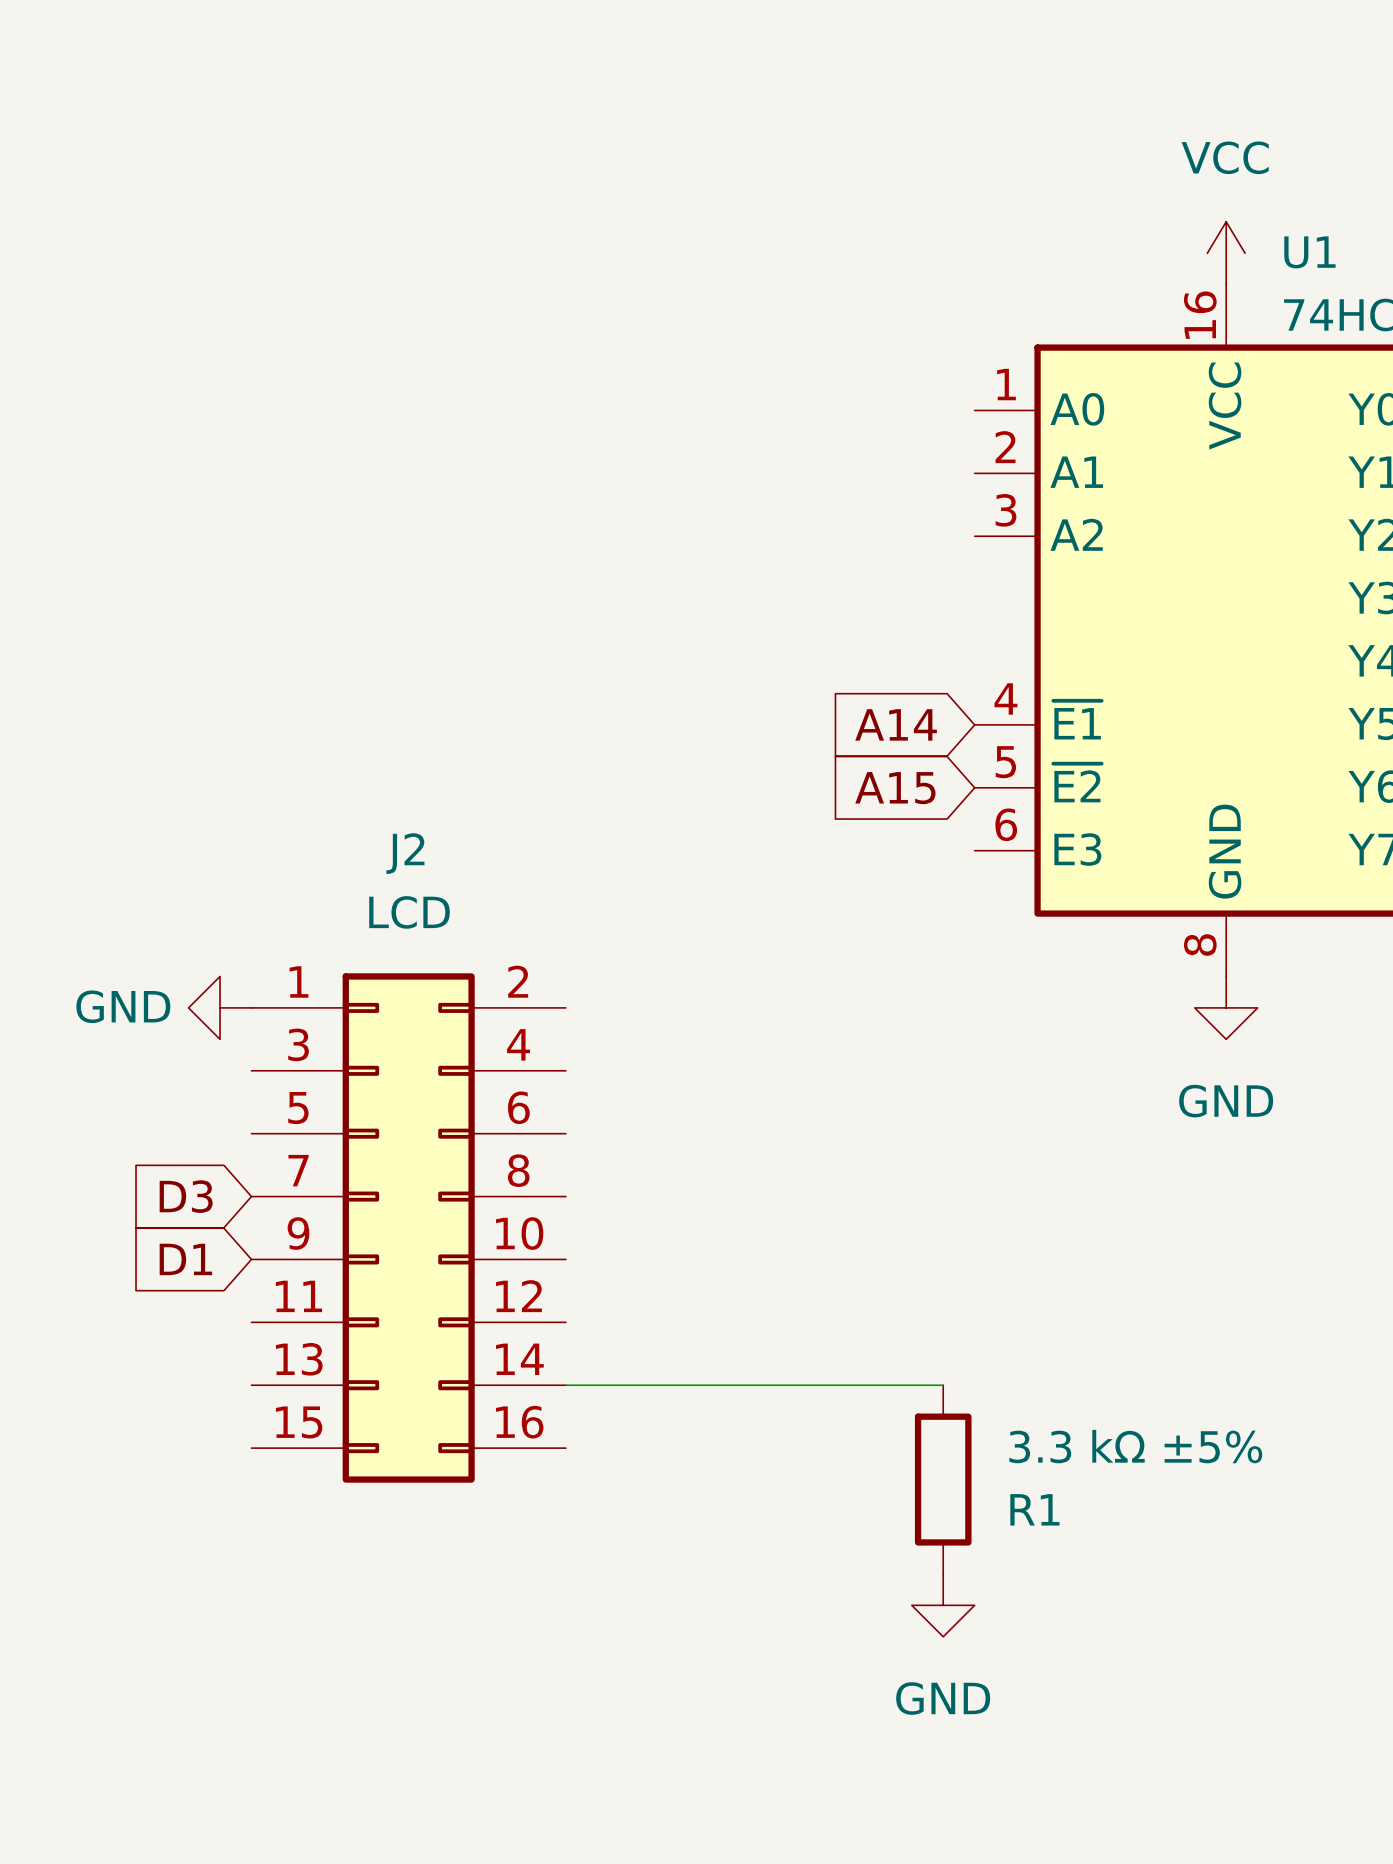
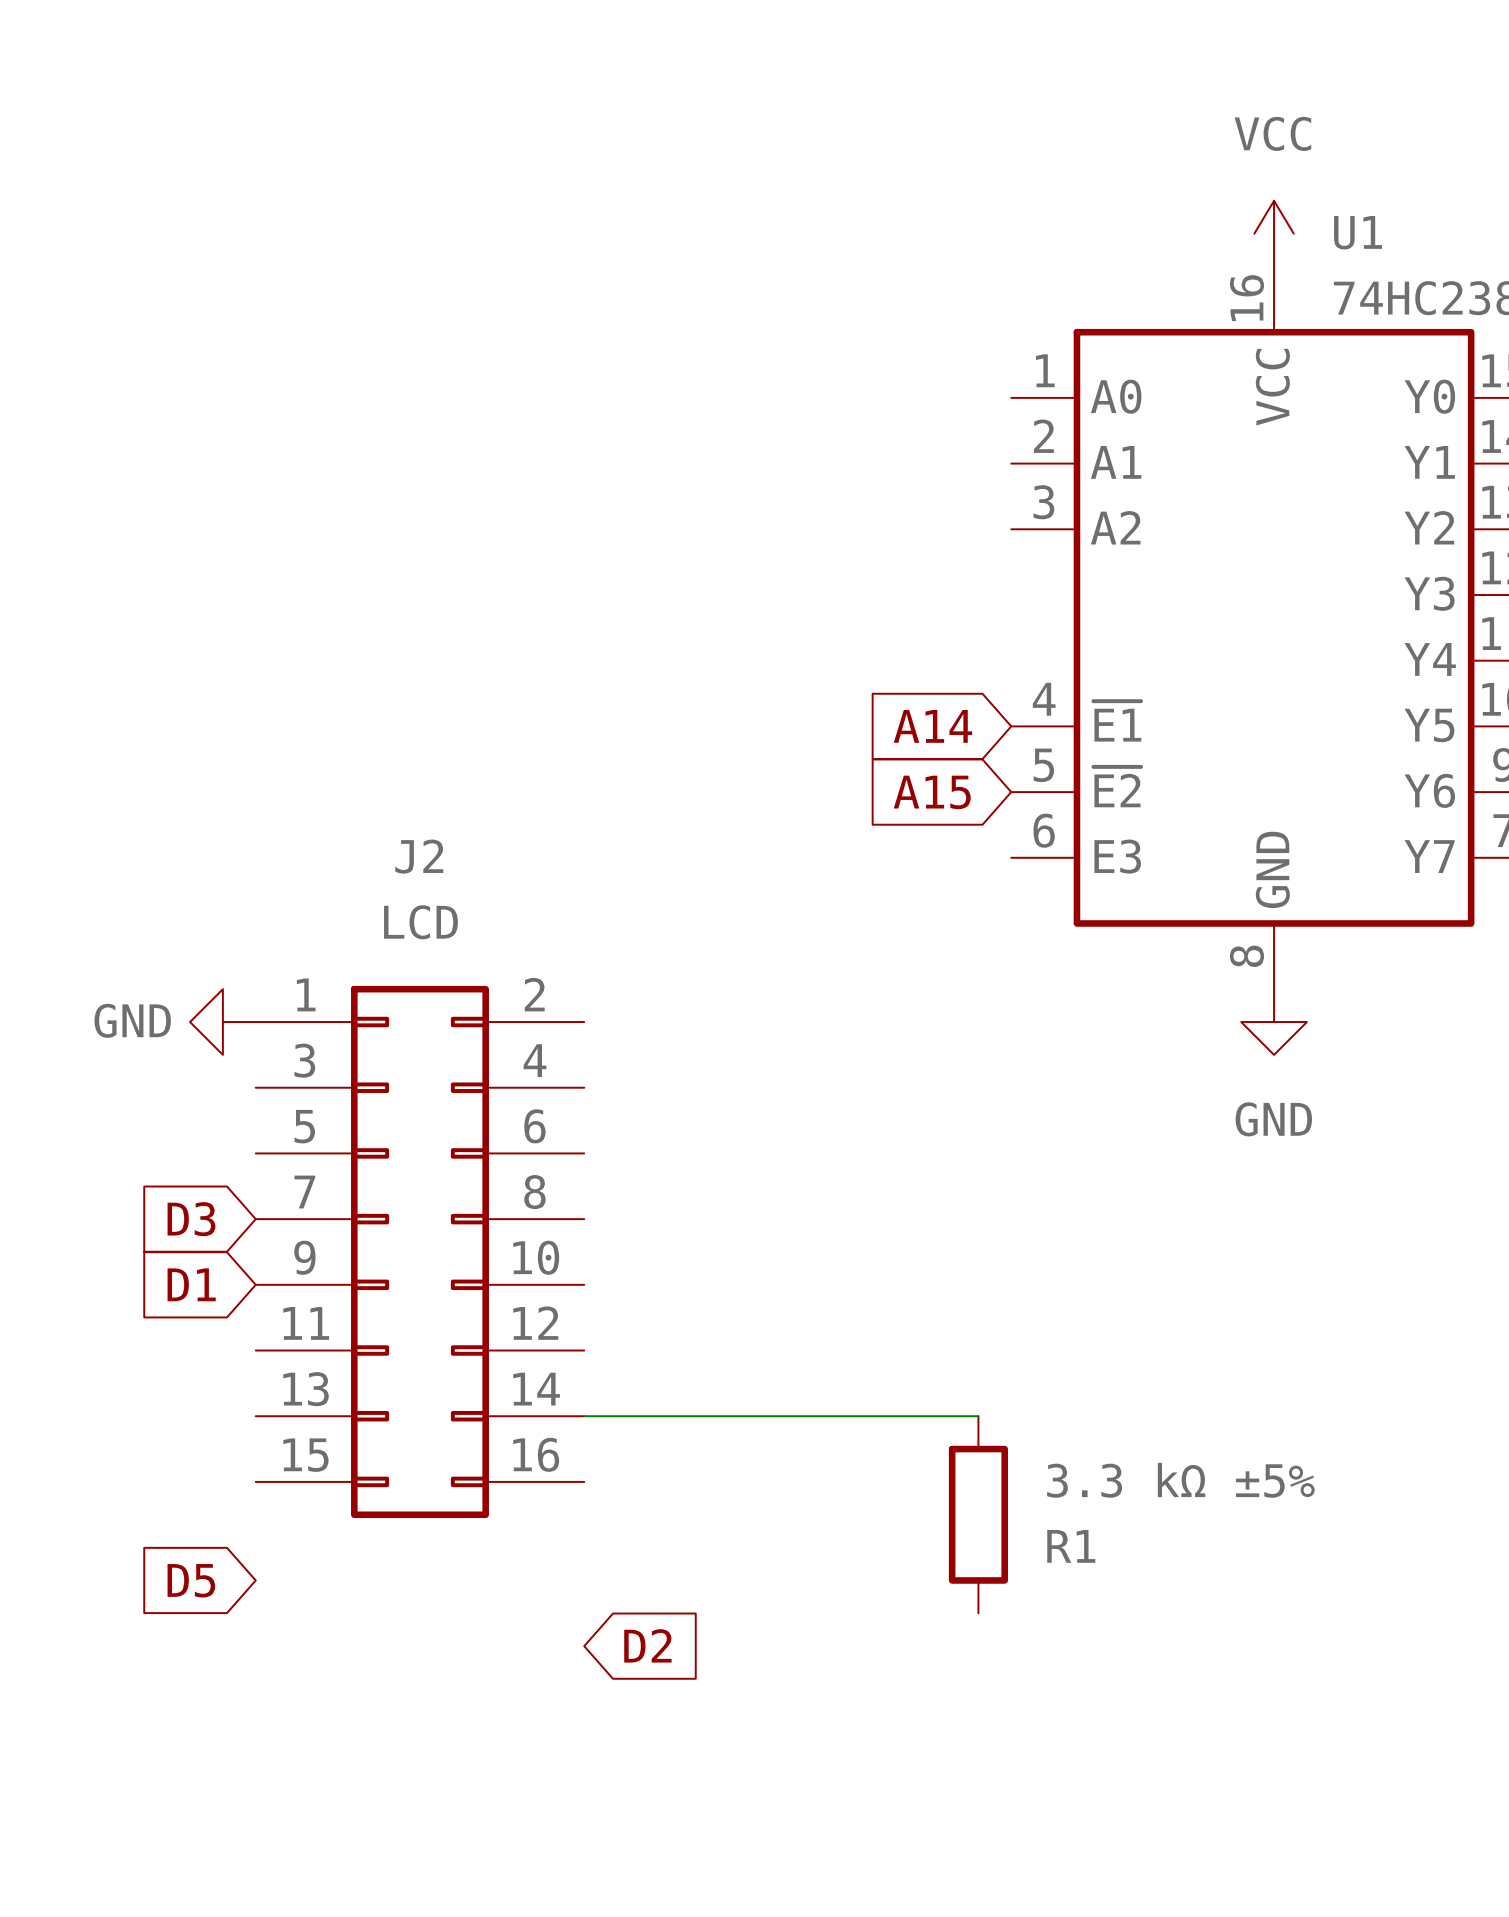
global label: none -> D5 (191, 1580)
global label: none -> D2 (647, 1645)
power symbol: GND (943, 1605) -> none

